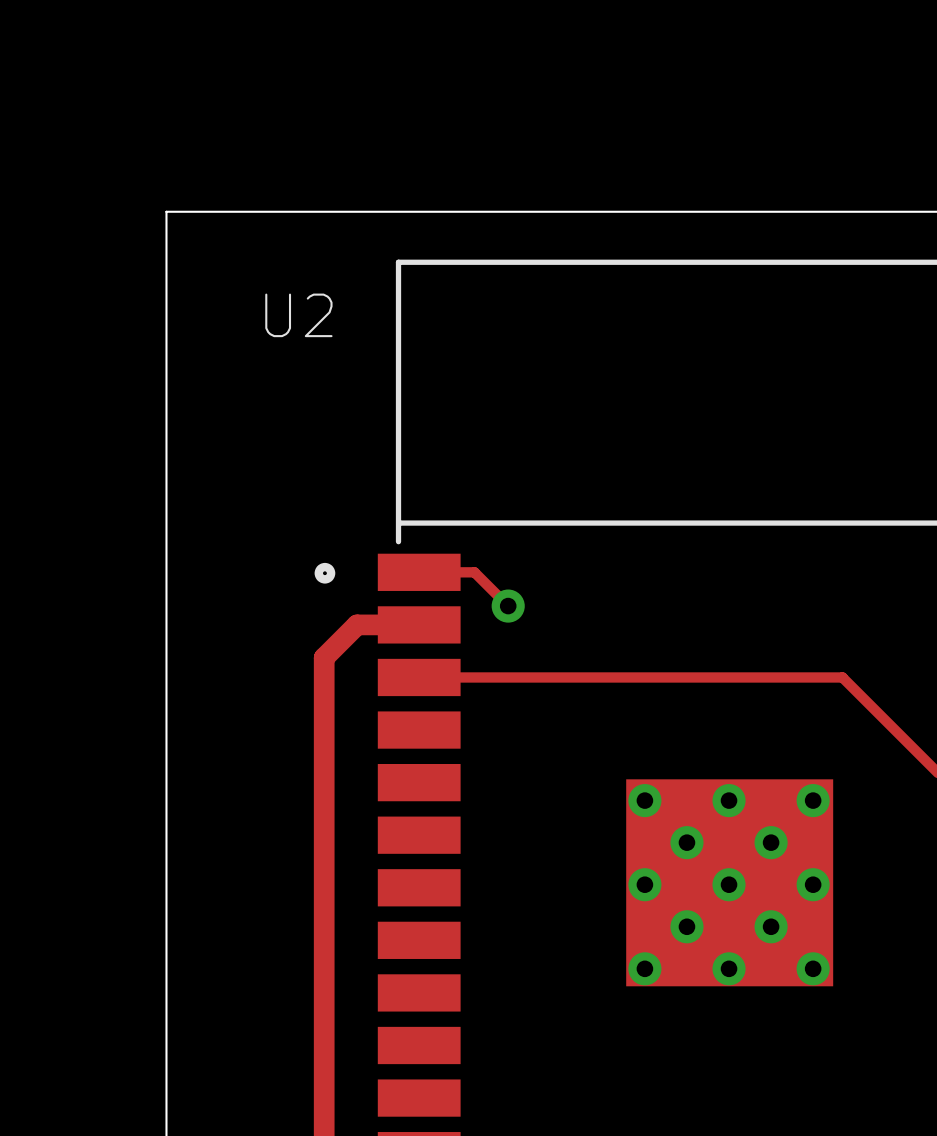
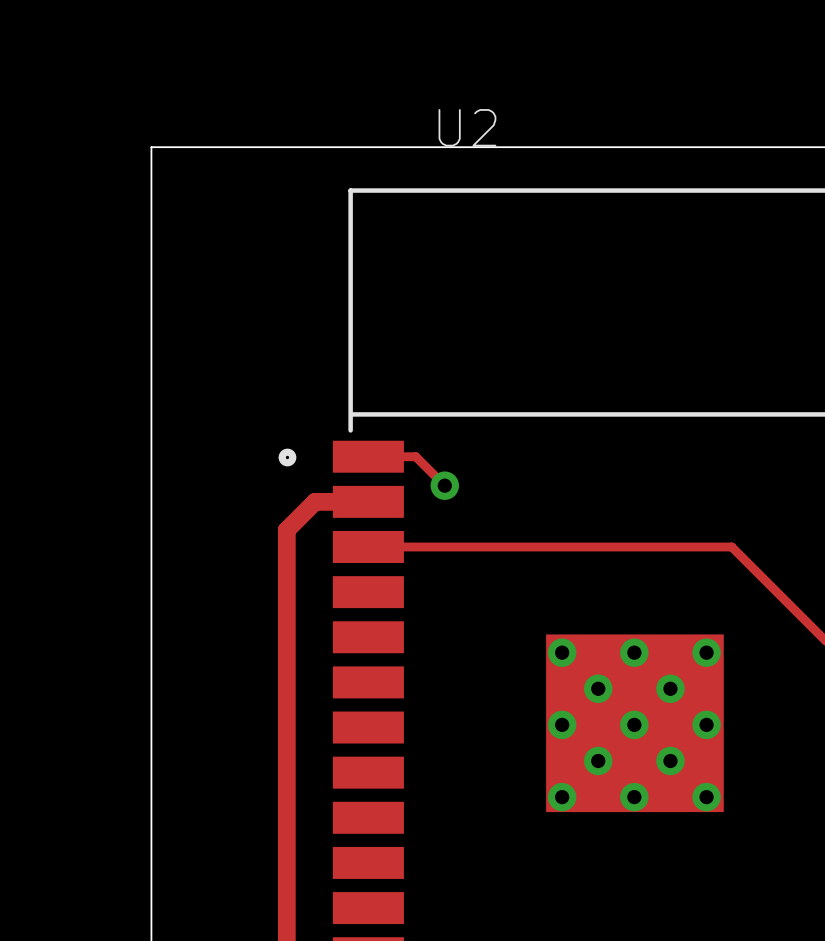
U2 name position: U2 (298, 315) -> U2 (467, 127)

